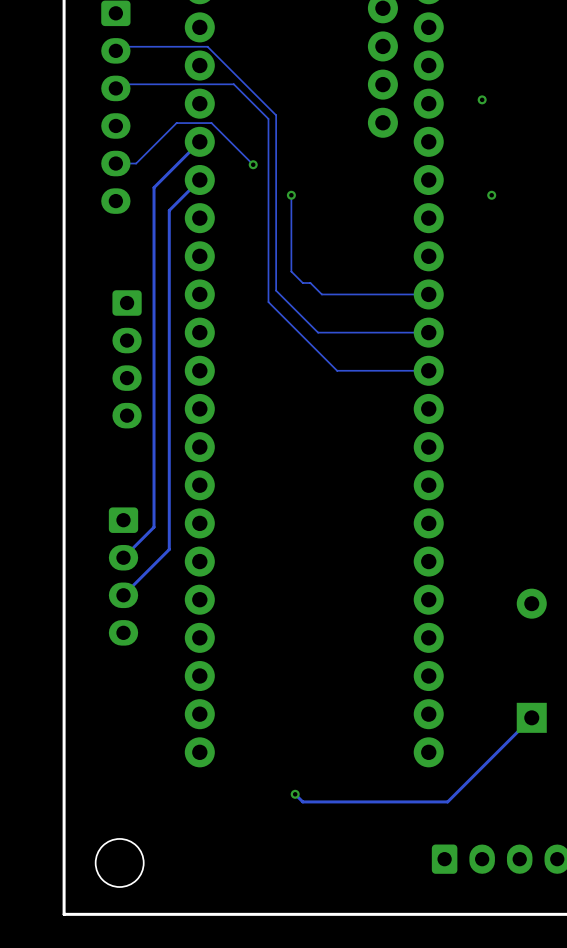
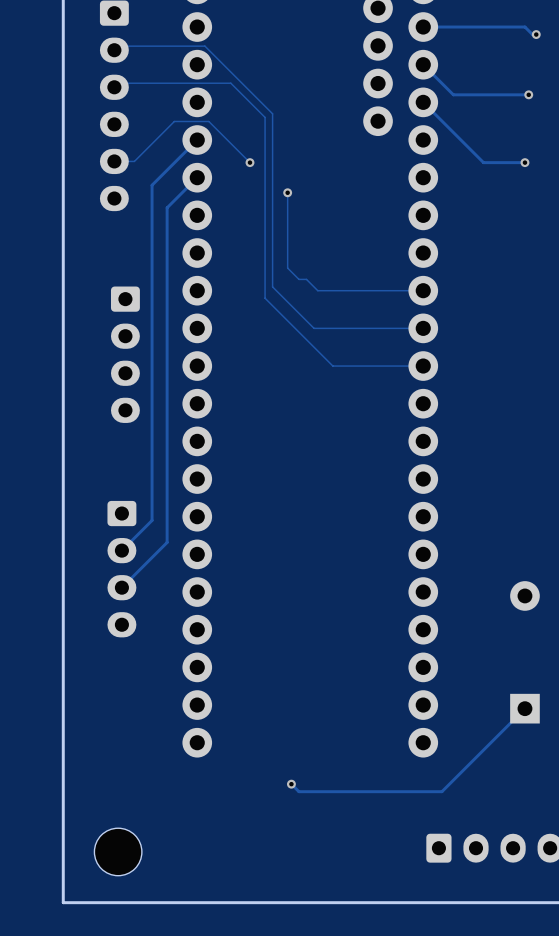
track: none -> (423, 27) (524, 27) (532, 34) (536, 34)
via: none -> (536, 34)
track: none -> (423, 64) (453, 94) (528, 94)
via: none -> (528, 94)
via: (482, 99) -> none
track: none -> (423, 102) (483, 162) (524, 162)
via: none -> (524, 162)
via: (491, 195) -> none

